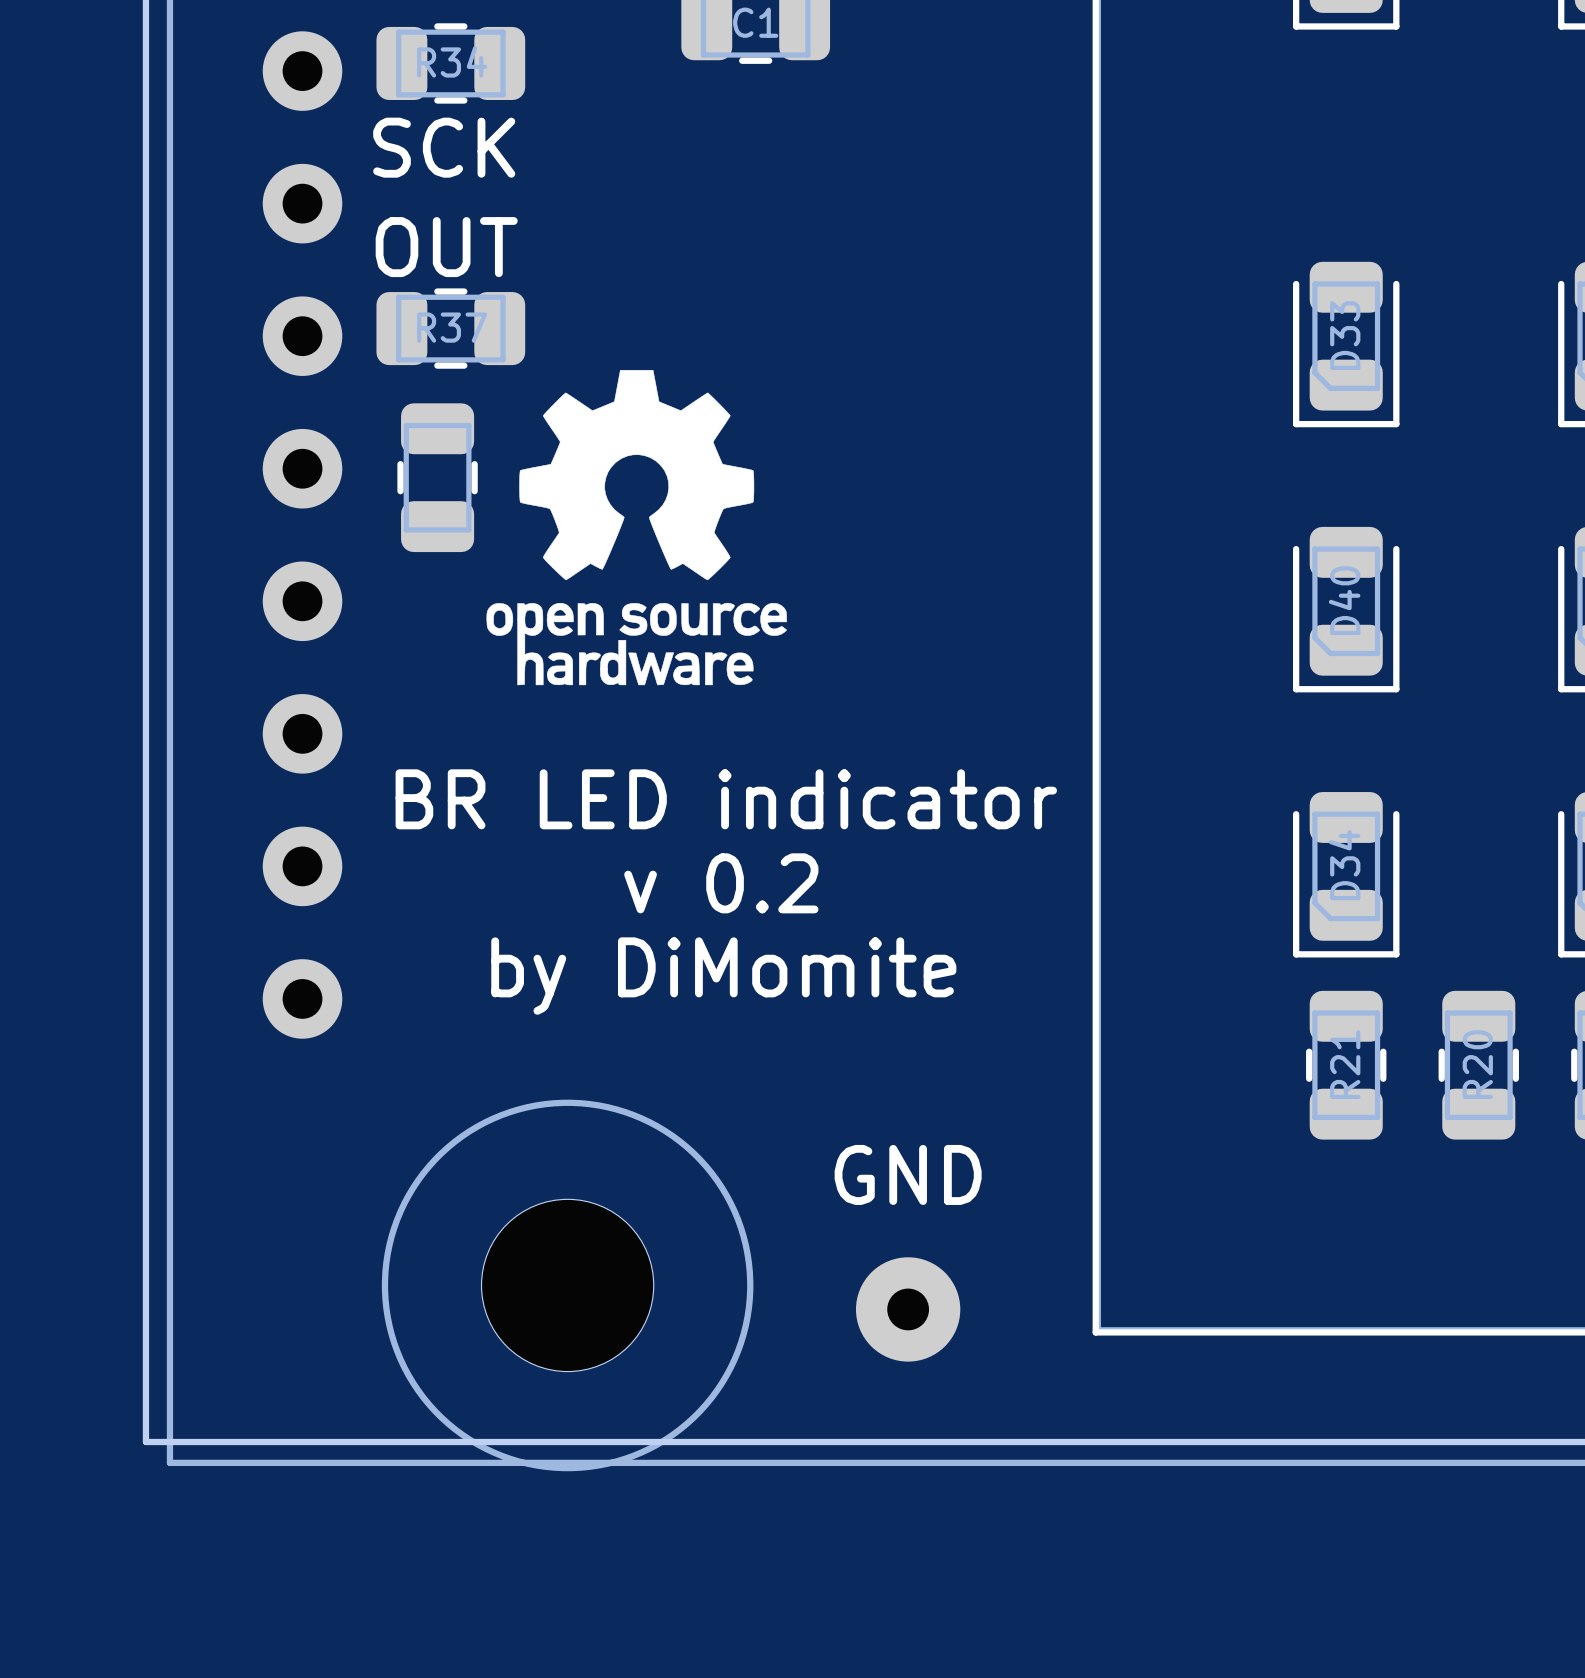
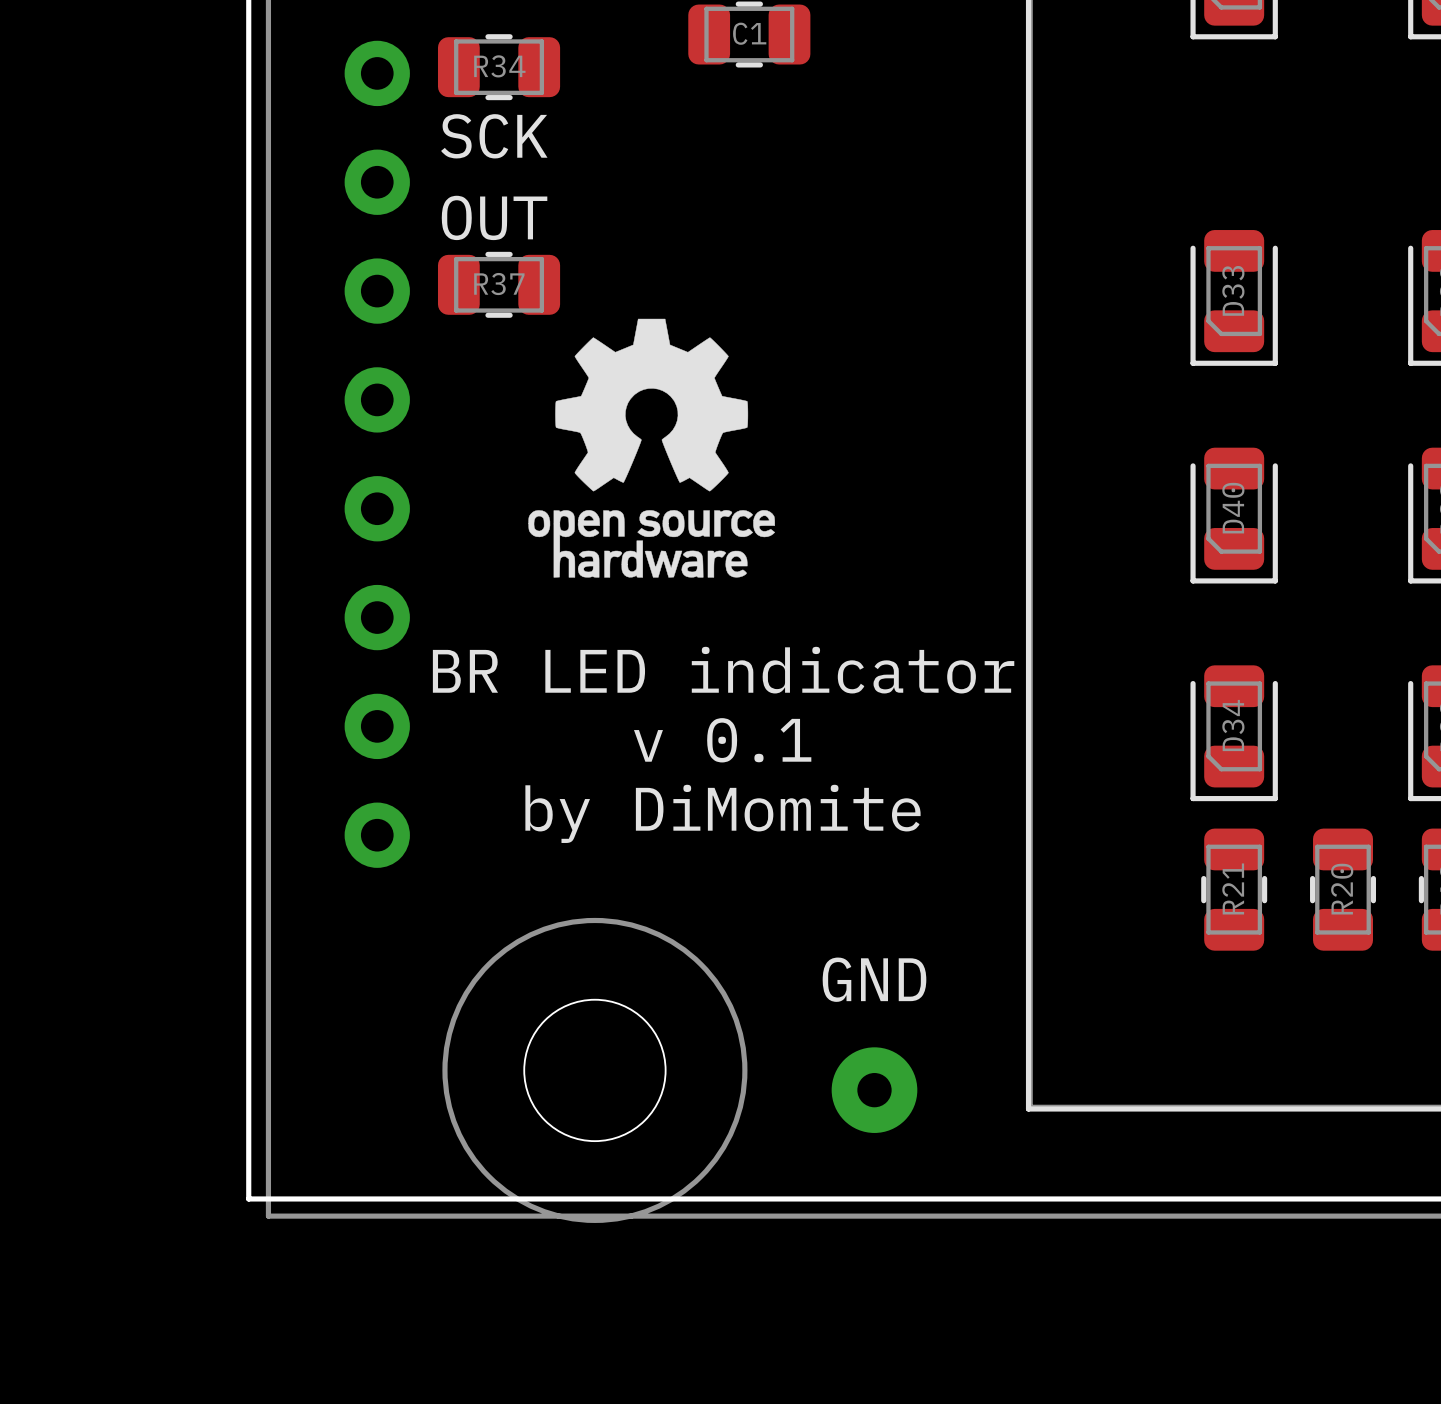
part: (437, 477) -> none
text: v 0.2 (721, 883) -> v 0.1 (722, 740)

